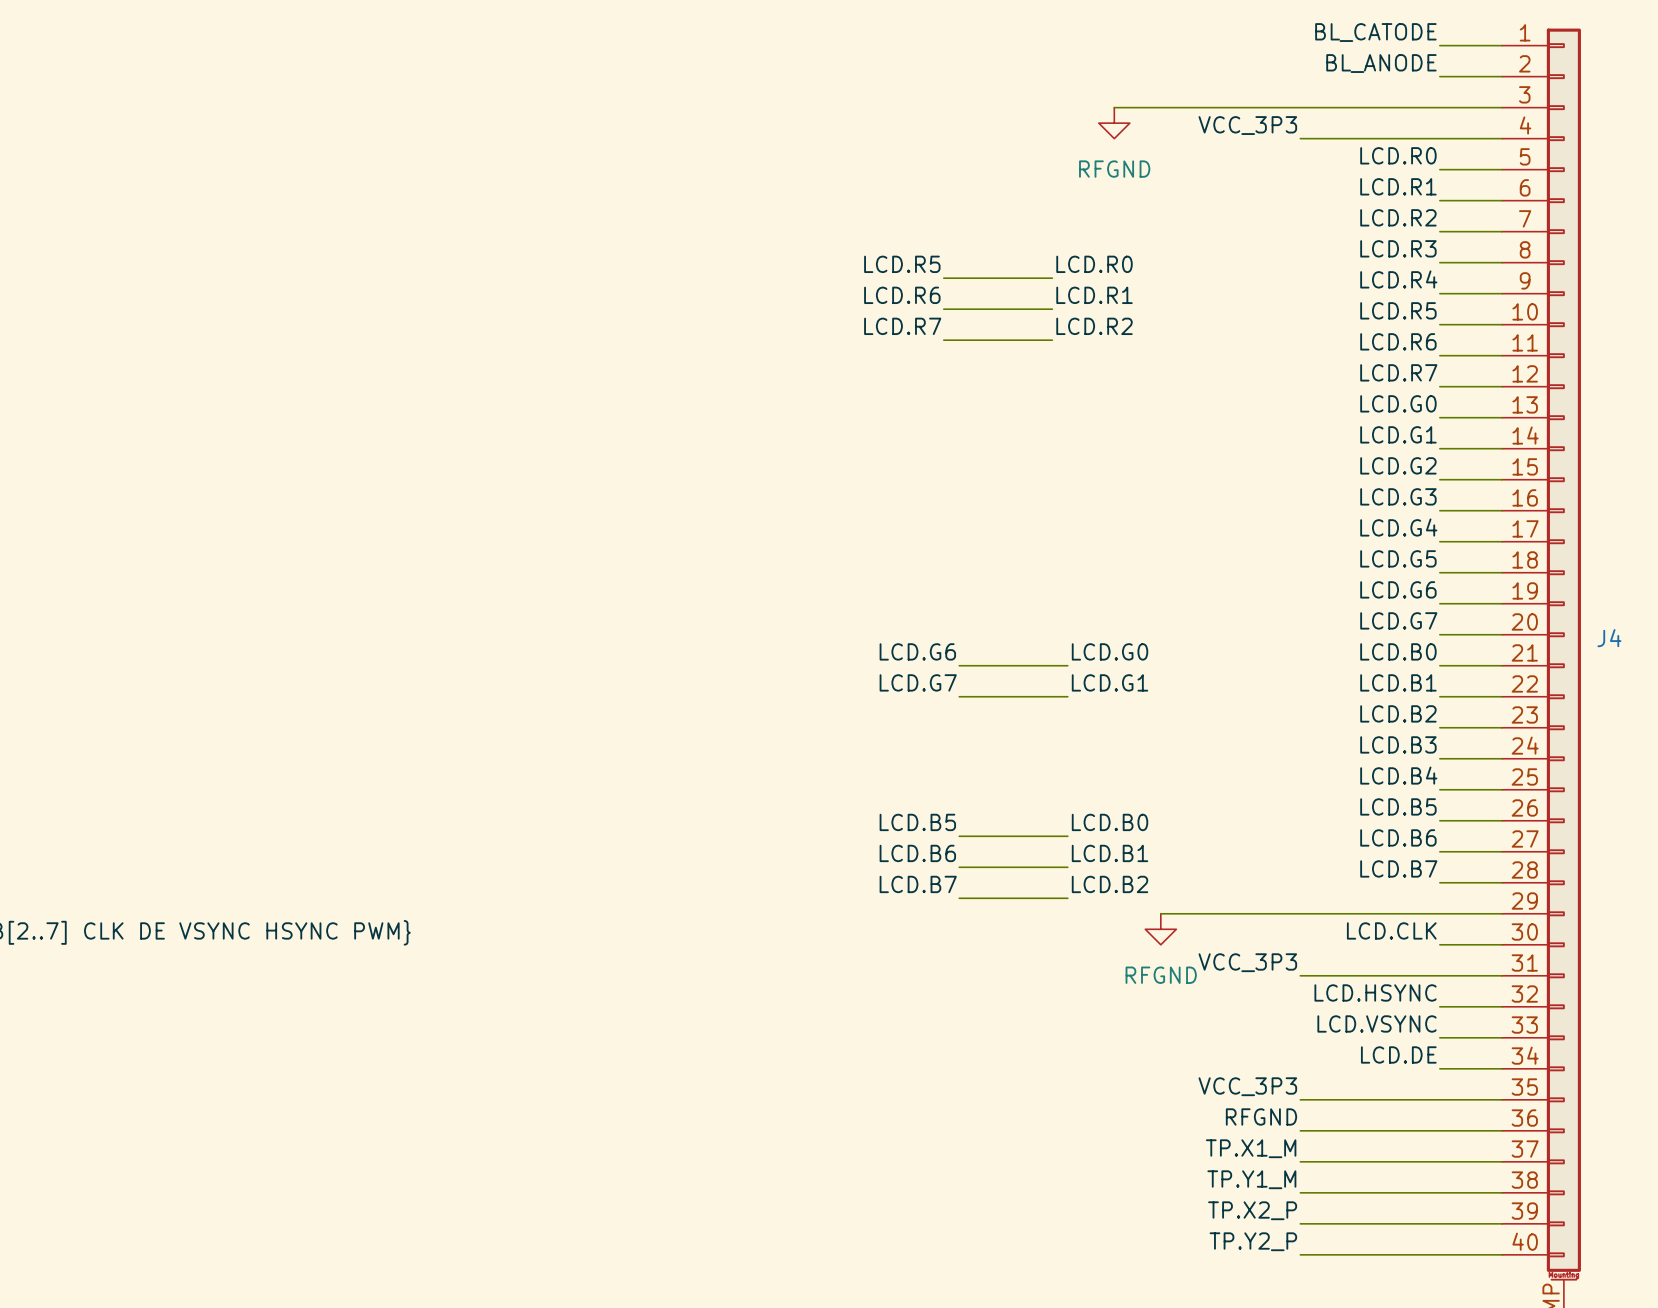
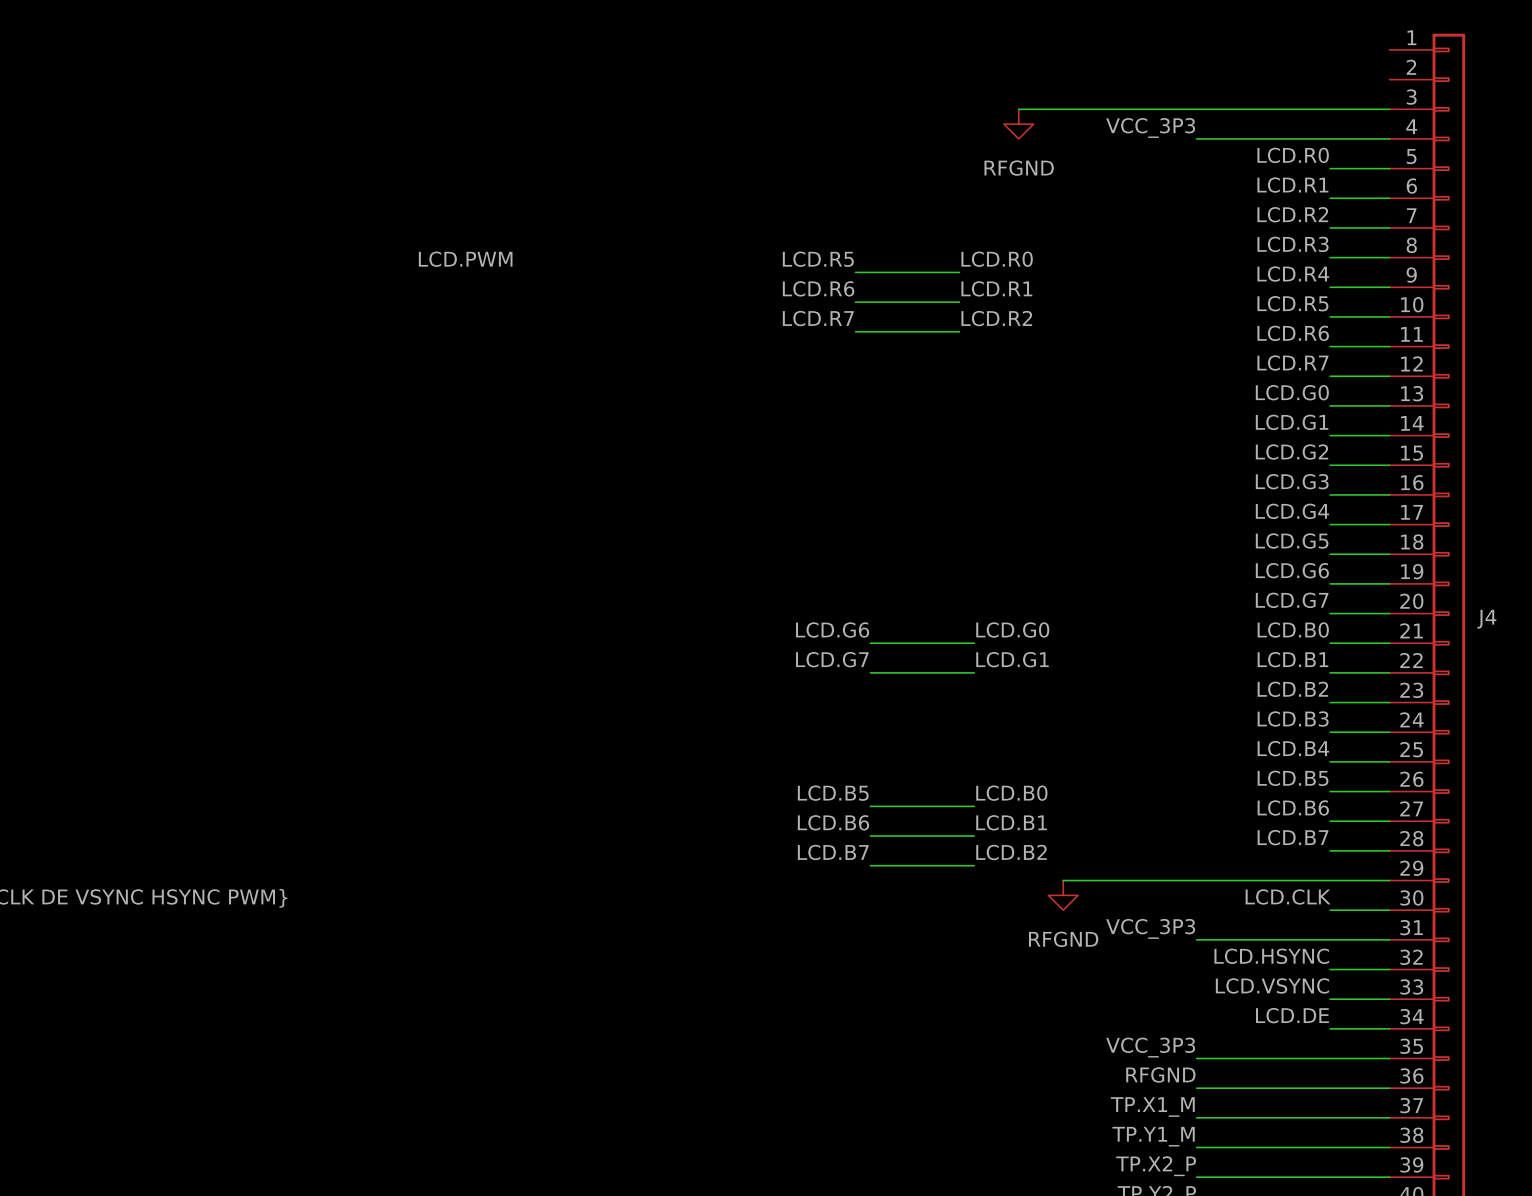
label: BL_CATODE (1375, 32) -> none
wire: (1439, 45) (1501, 45) -> none
label: BL_ANODE (1381, 63) -> none
wire: (1439, 76) (1501, 76) -> none
label: none -> LCD.PWM (465, 259)

